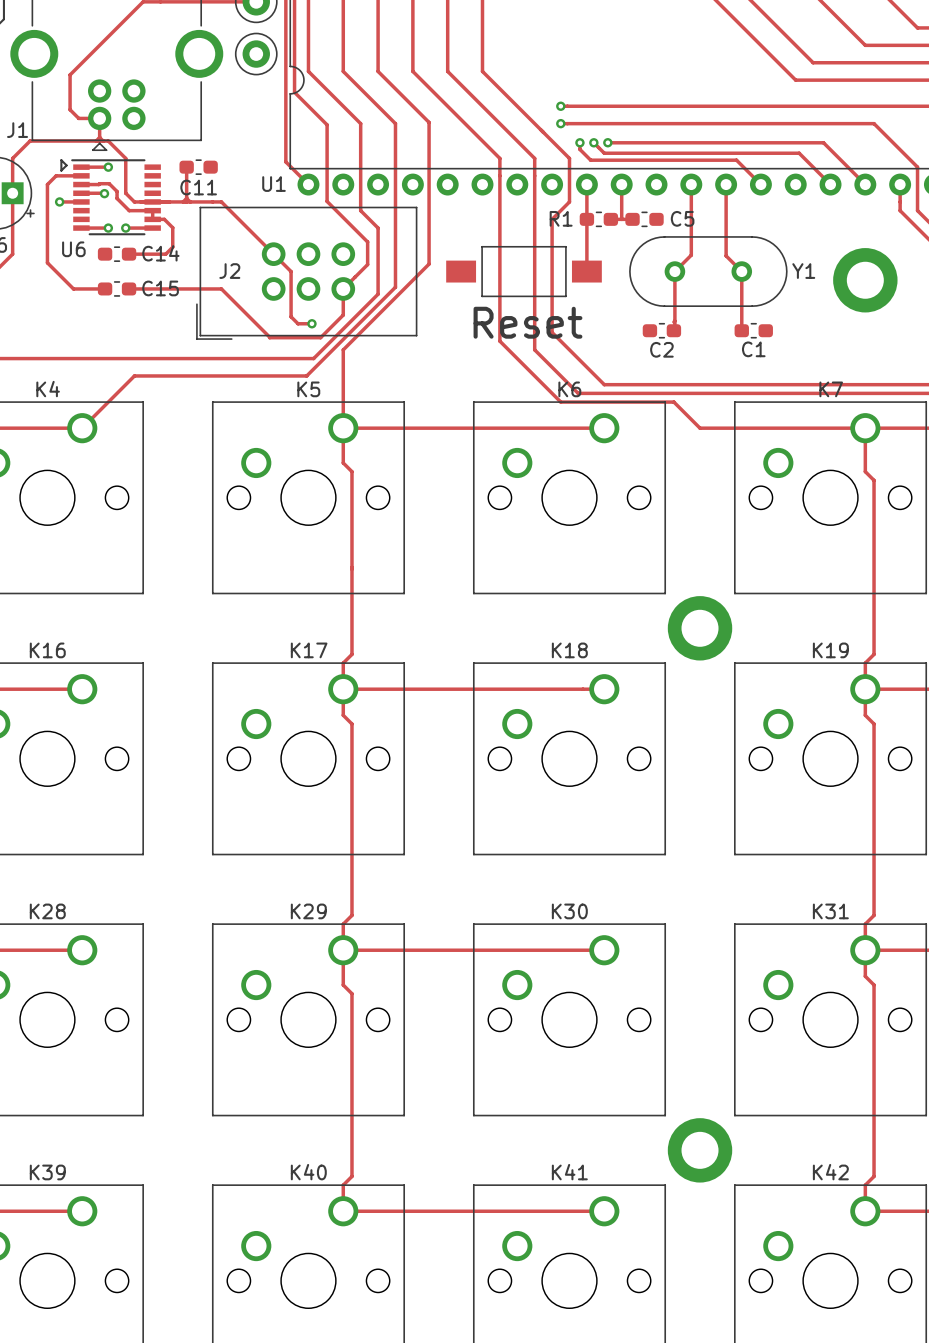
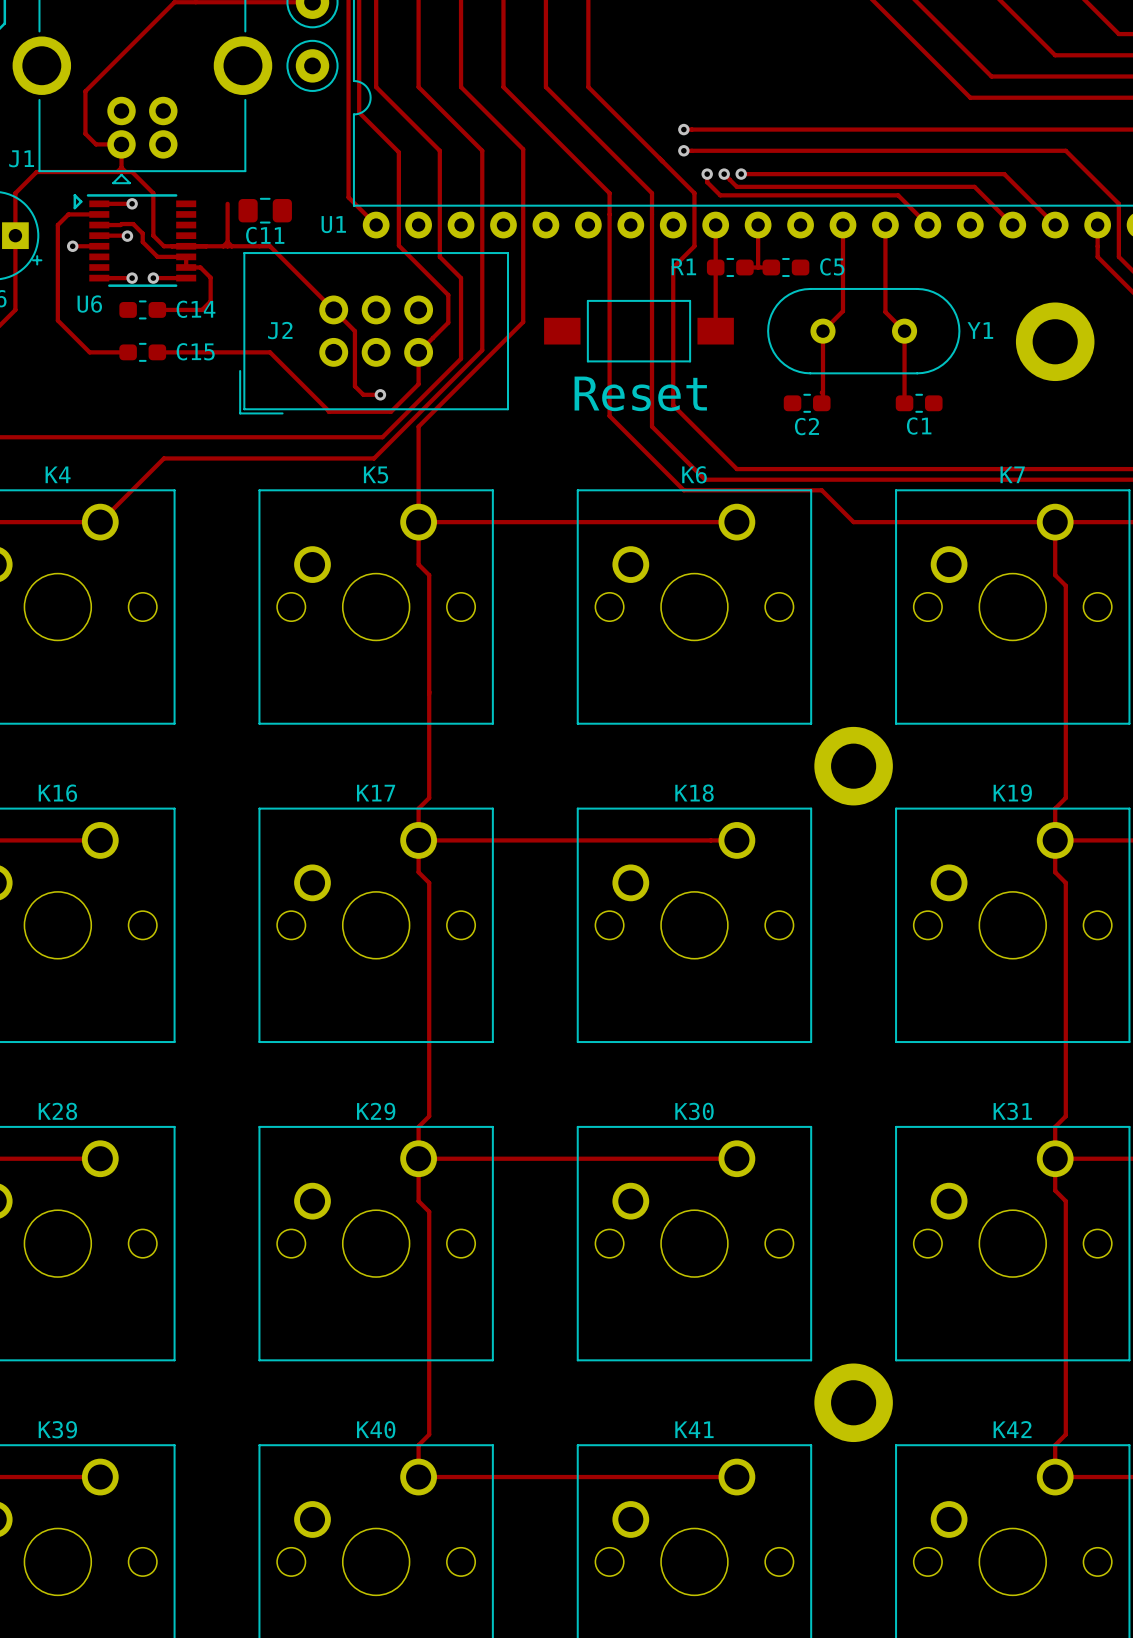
C11 footprint: [179, 159, 218, 175] -> [238, 197, 292, 224]

